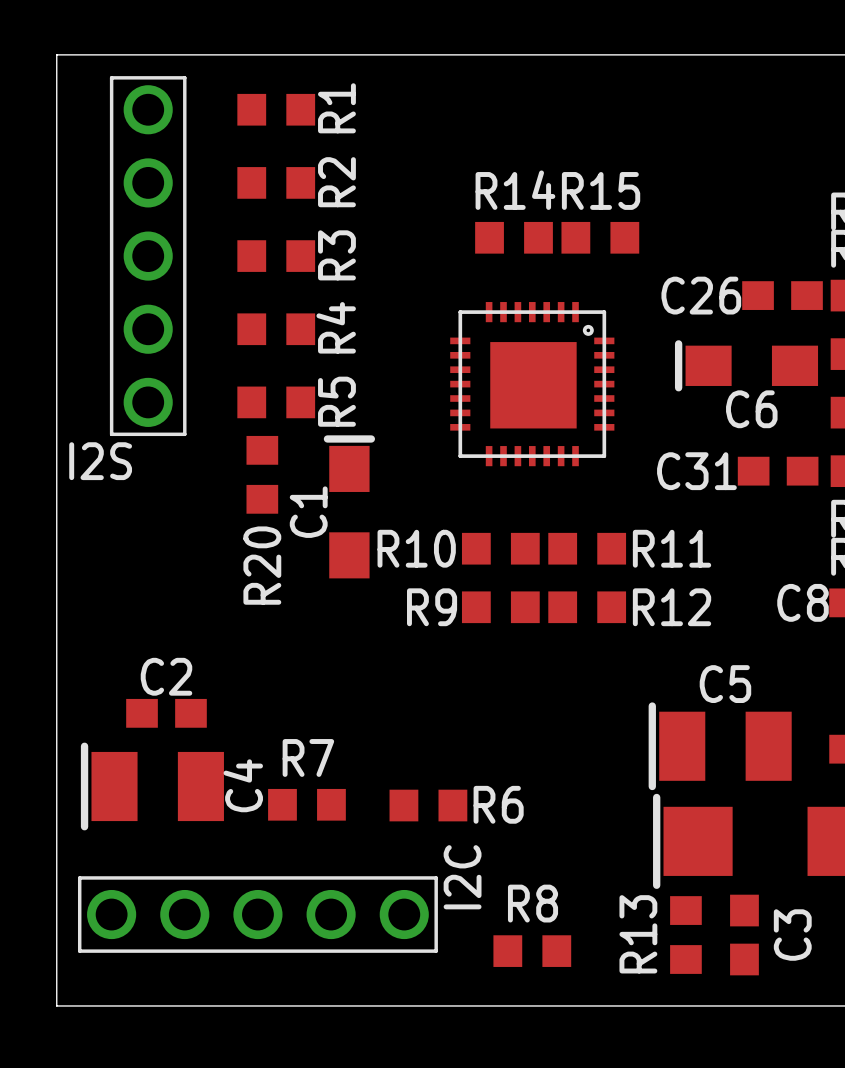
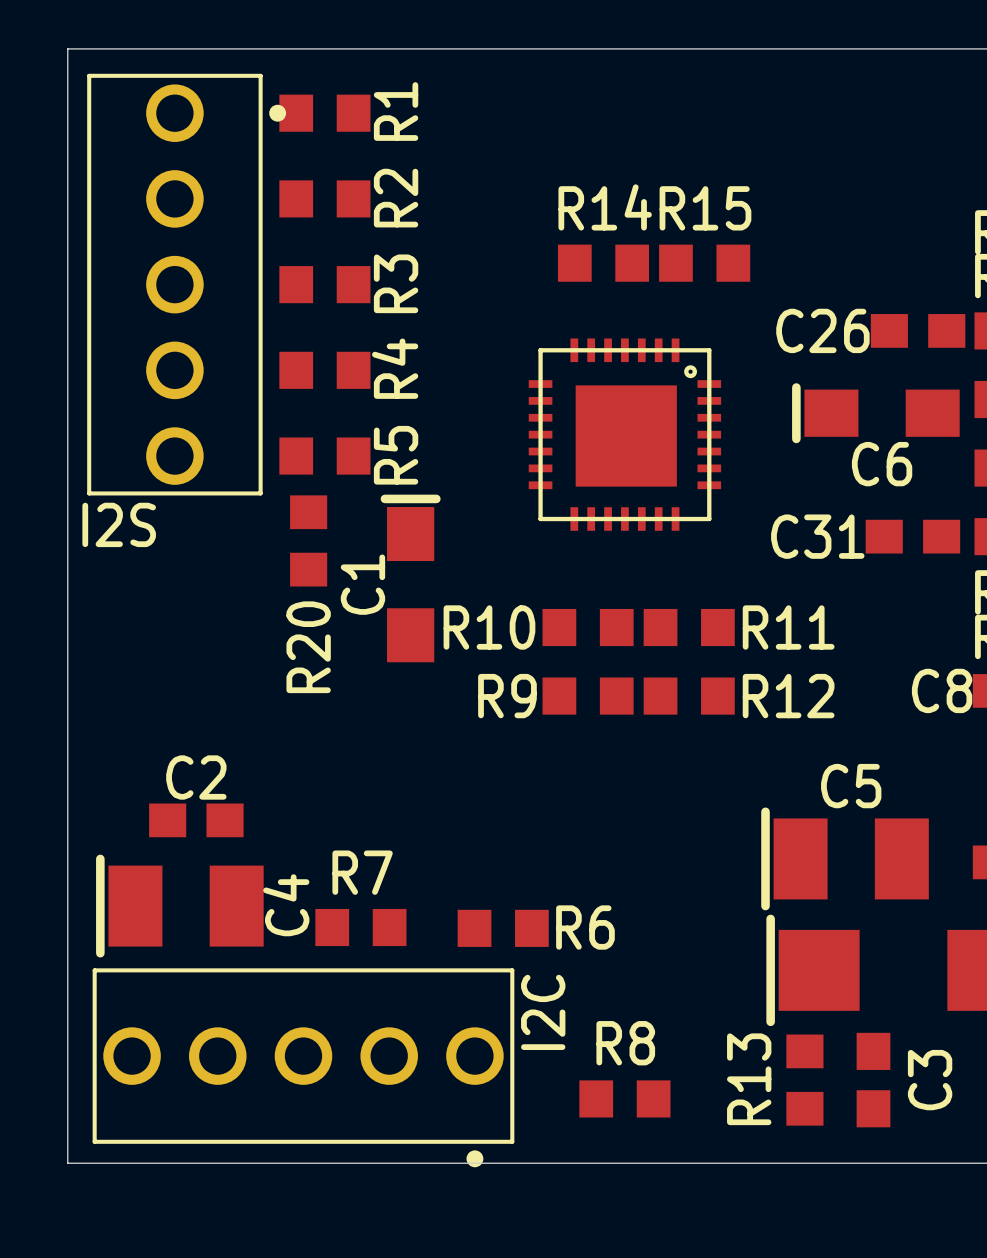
I2S footprint: [109, 76, 187, 437] -> [87, 73, 287, 496]
I2C footprint: [77, 876, 438, 953] -> [92, 968, 515, 1168]

